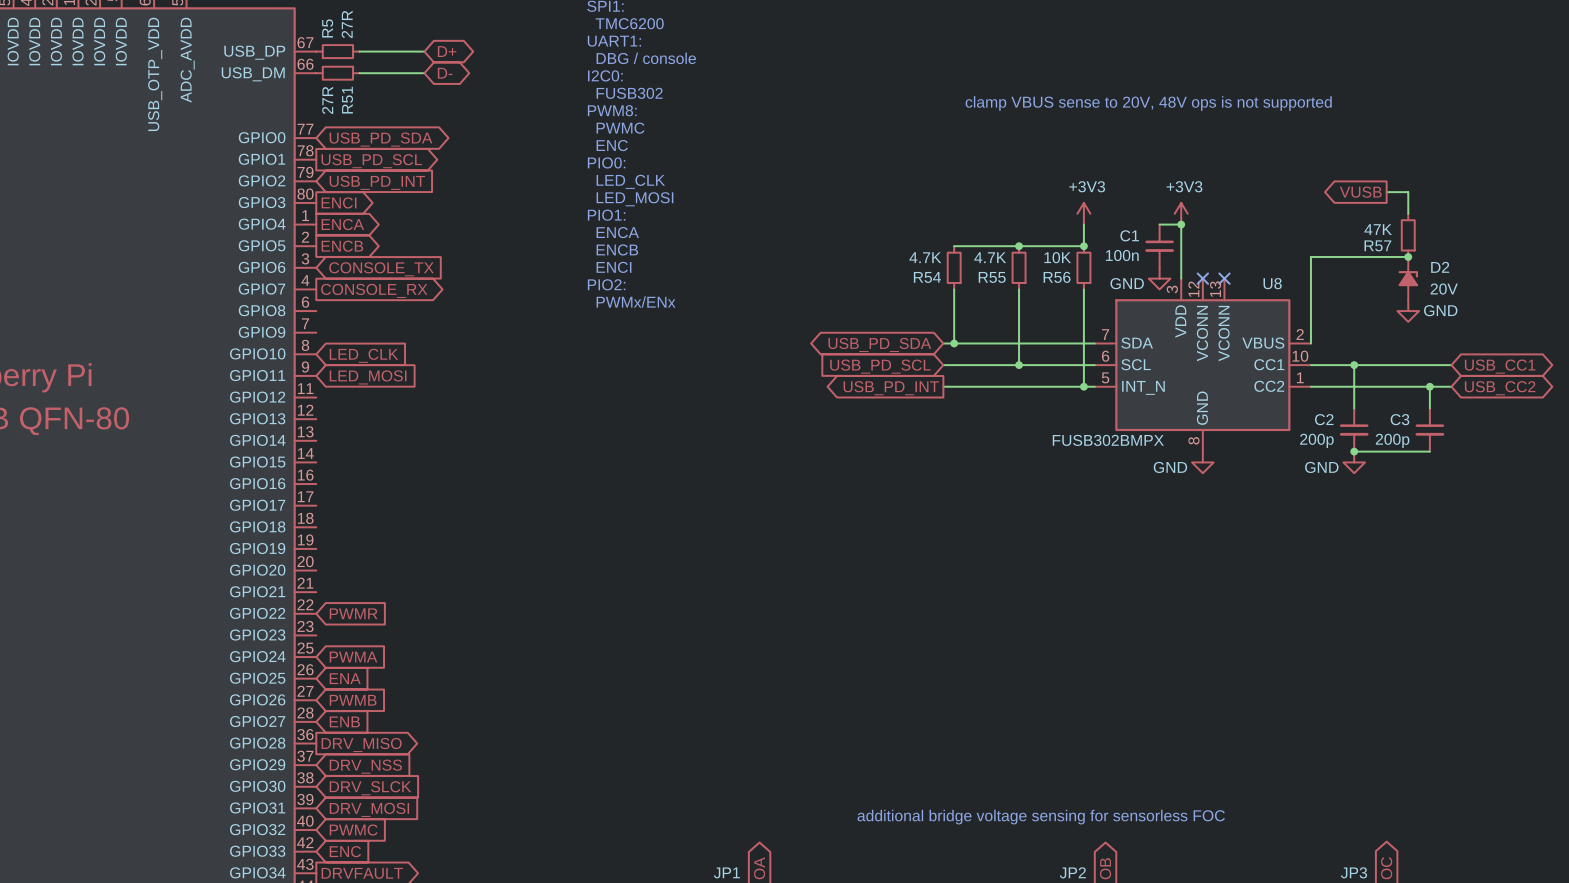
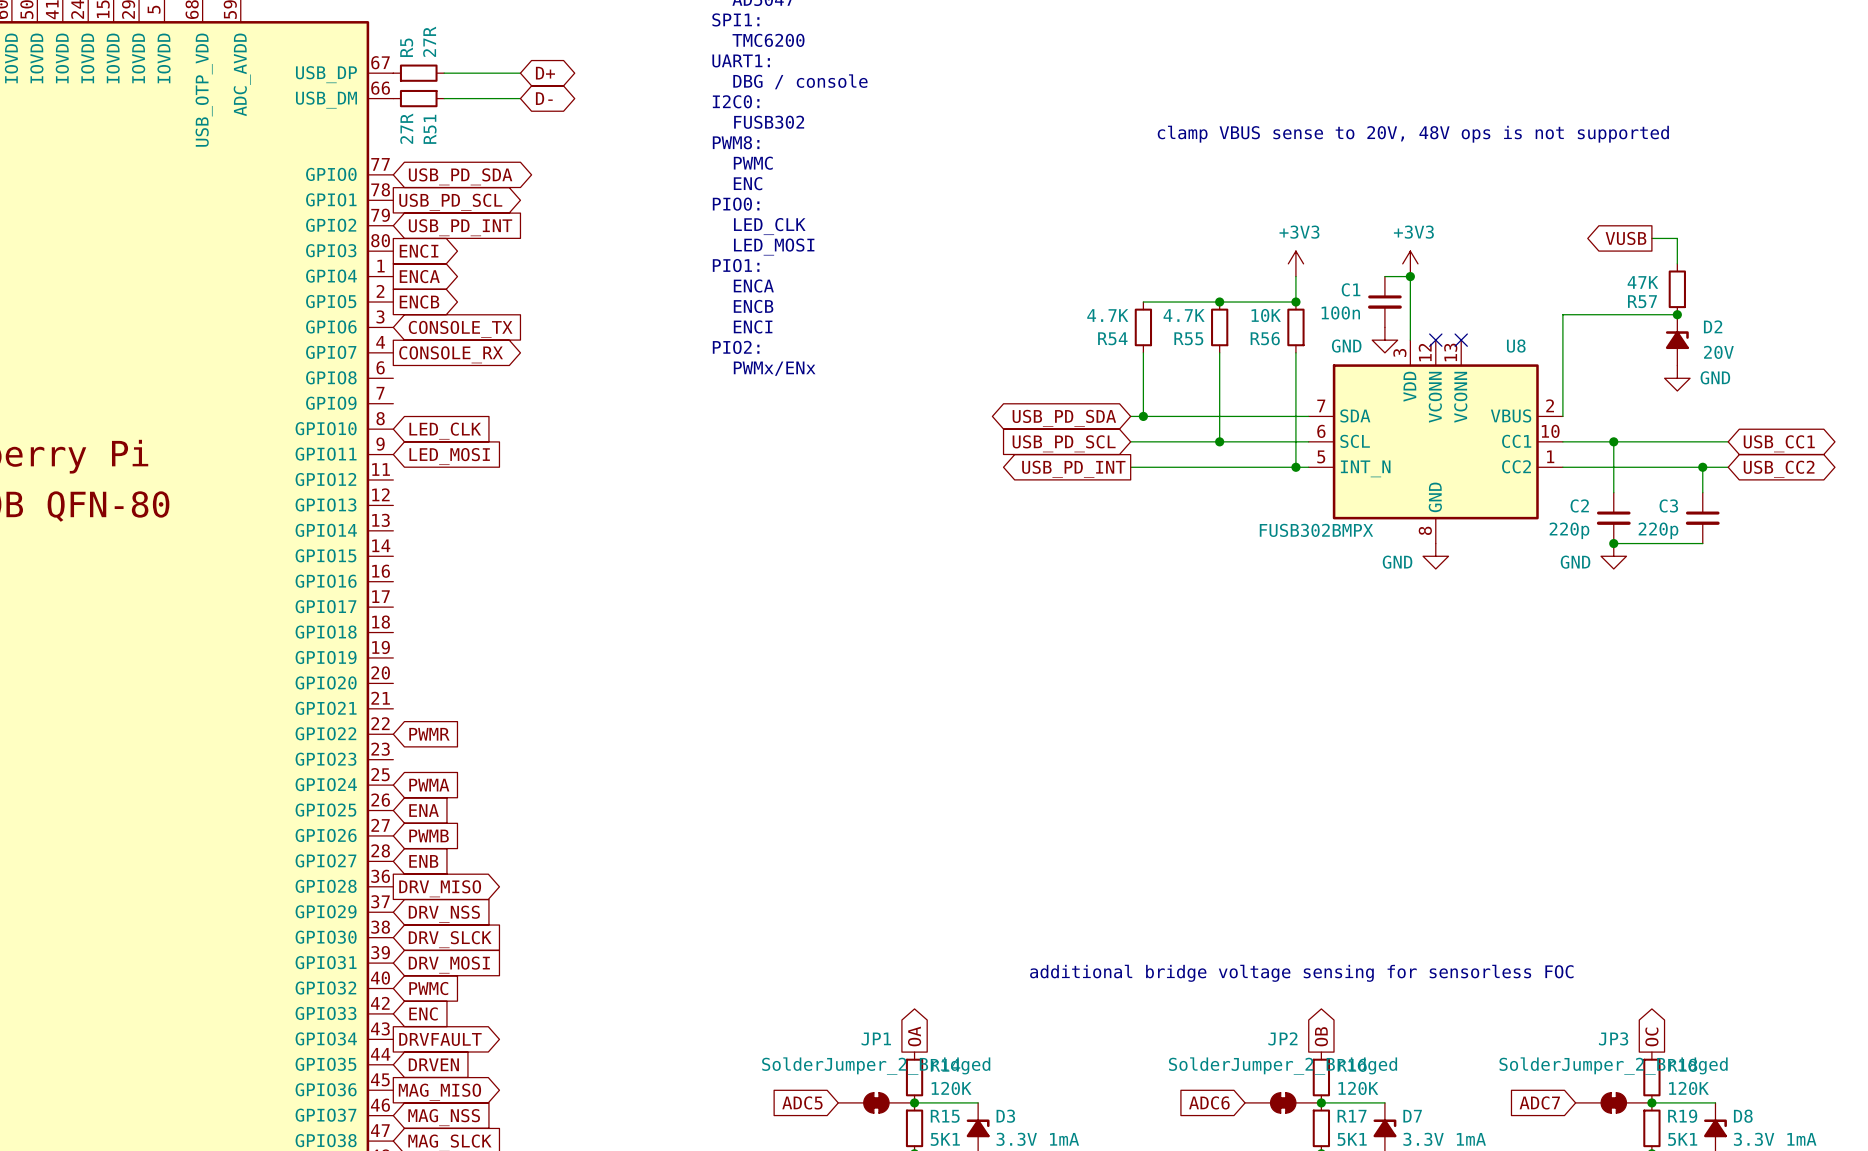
C2 value: 200p (1316, 440) -> 220p (1569, 530)
C3 value: 200p (1392, 440) -> 220p (1658, 530)

